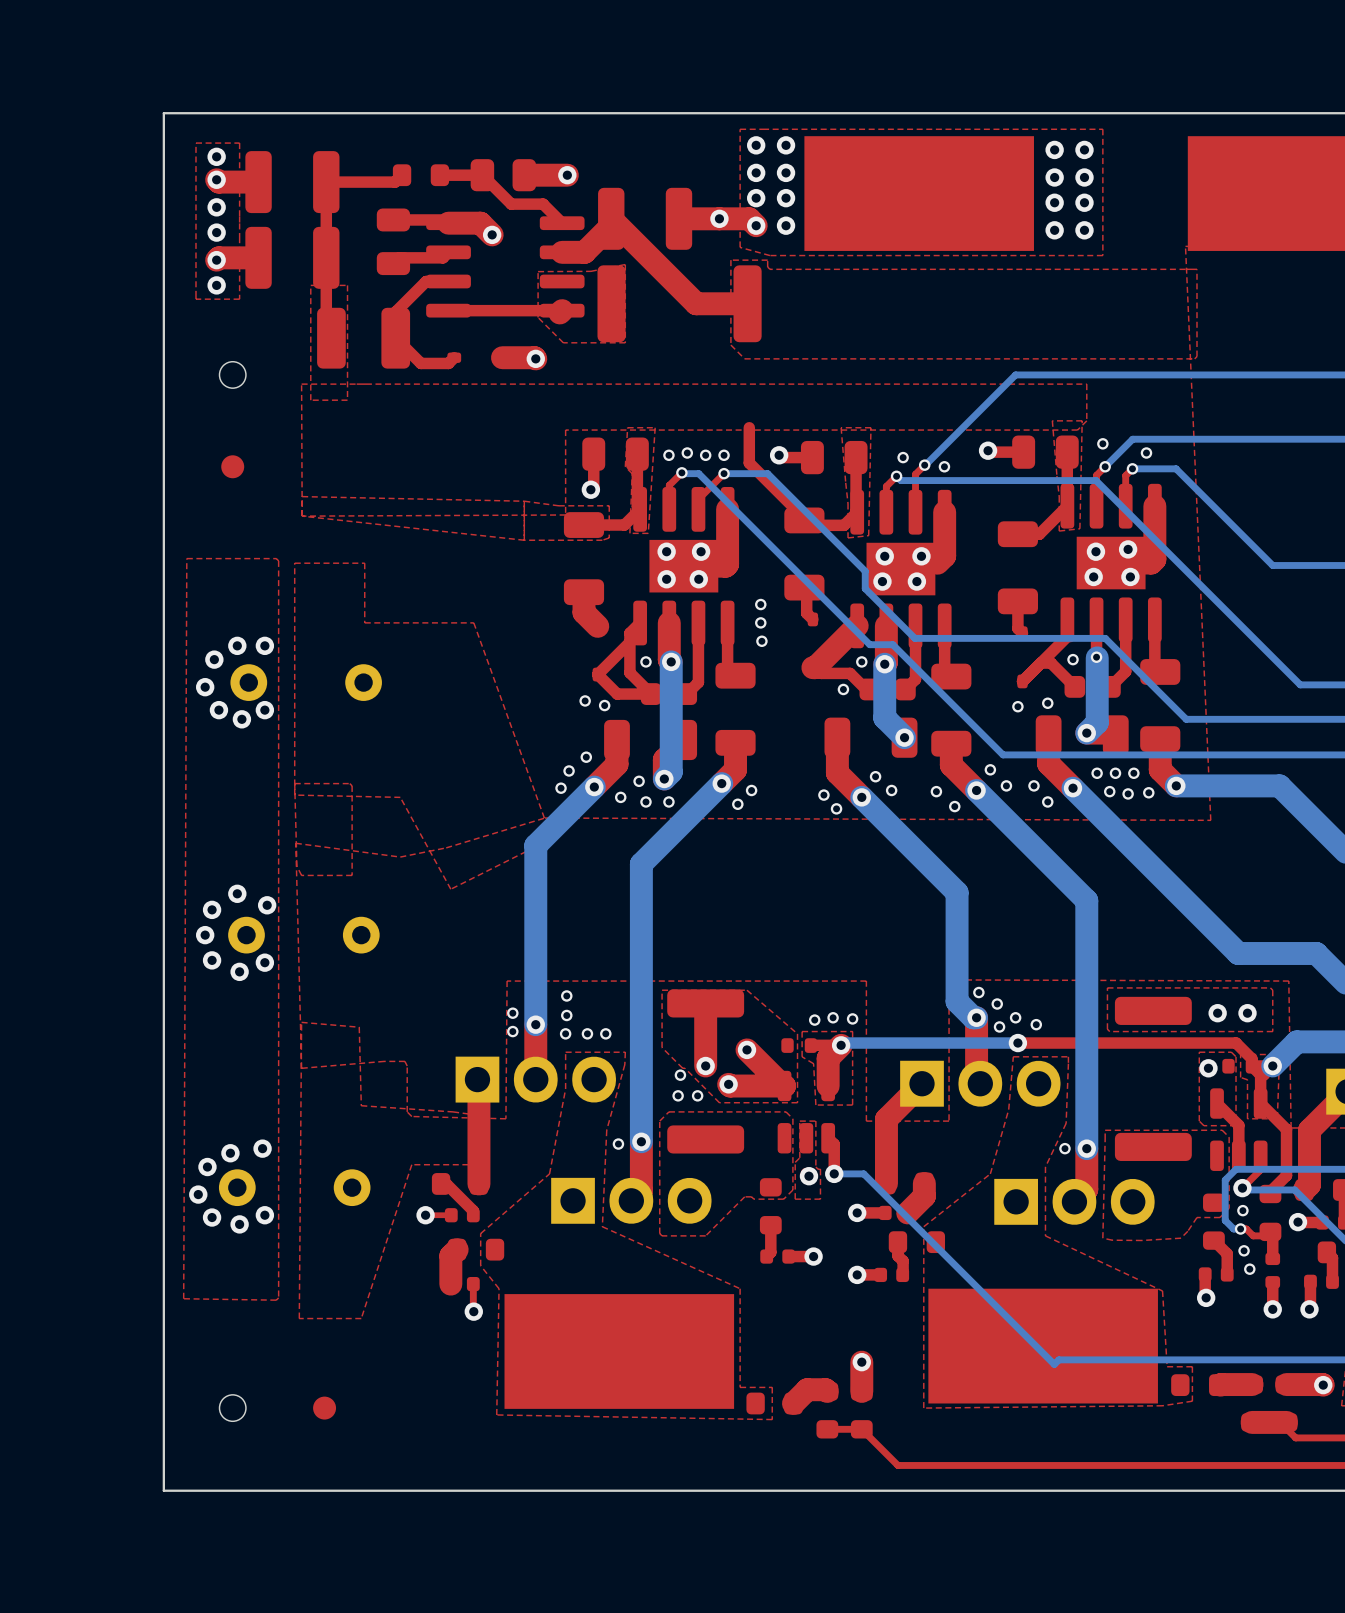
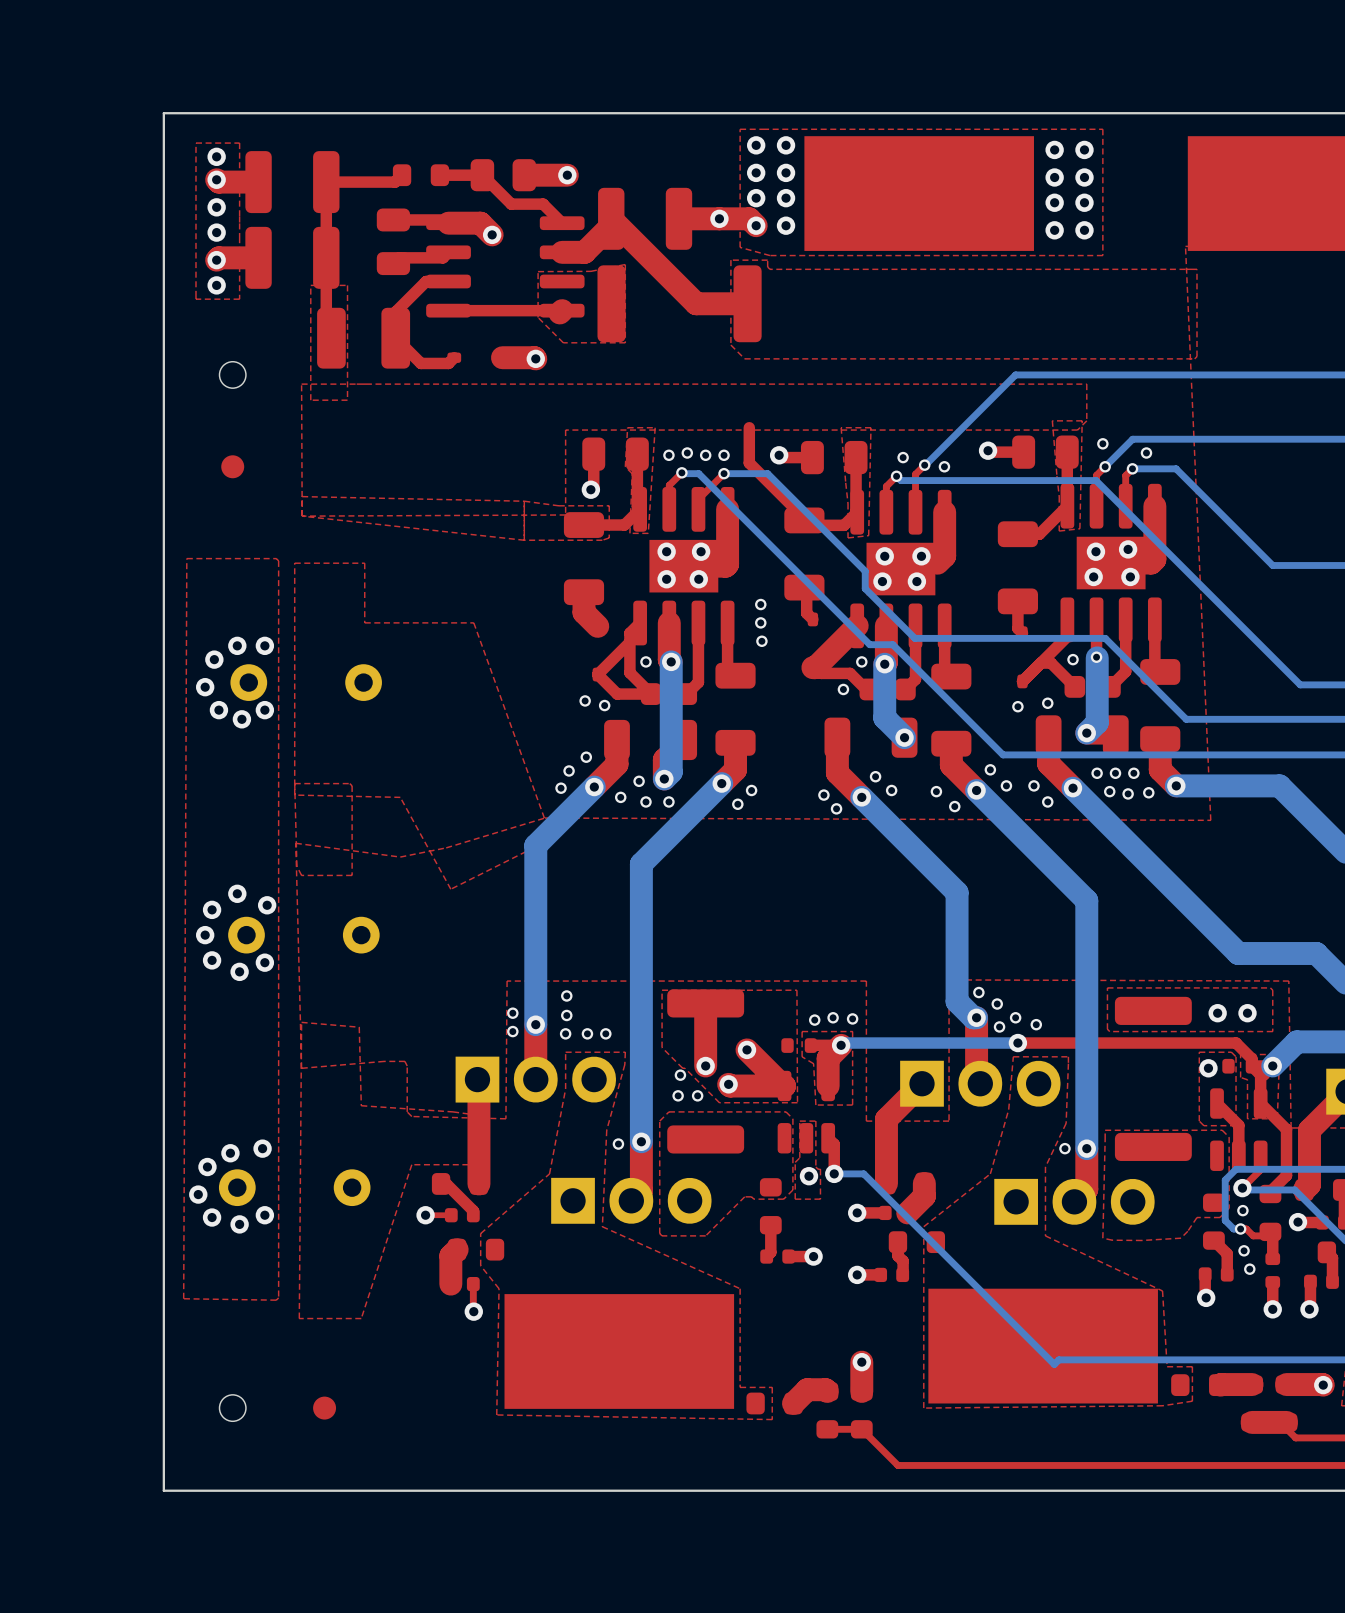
top zone outline: (747, 990) (797, 1033) (797, 1102) -> (747, 990) (796, 990) (797, 1102)

